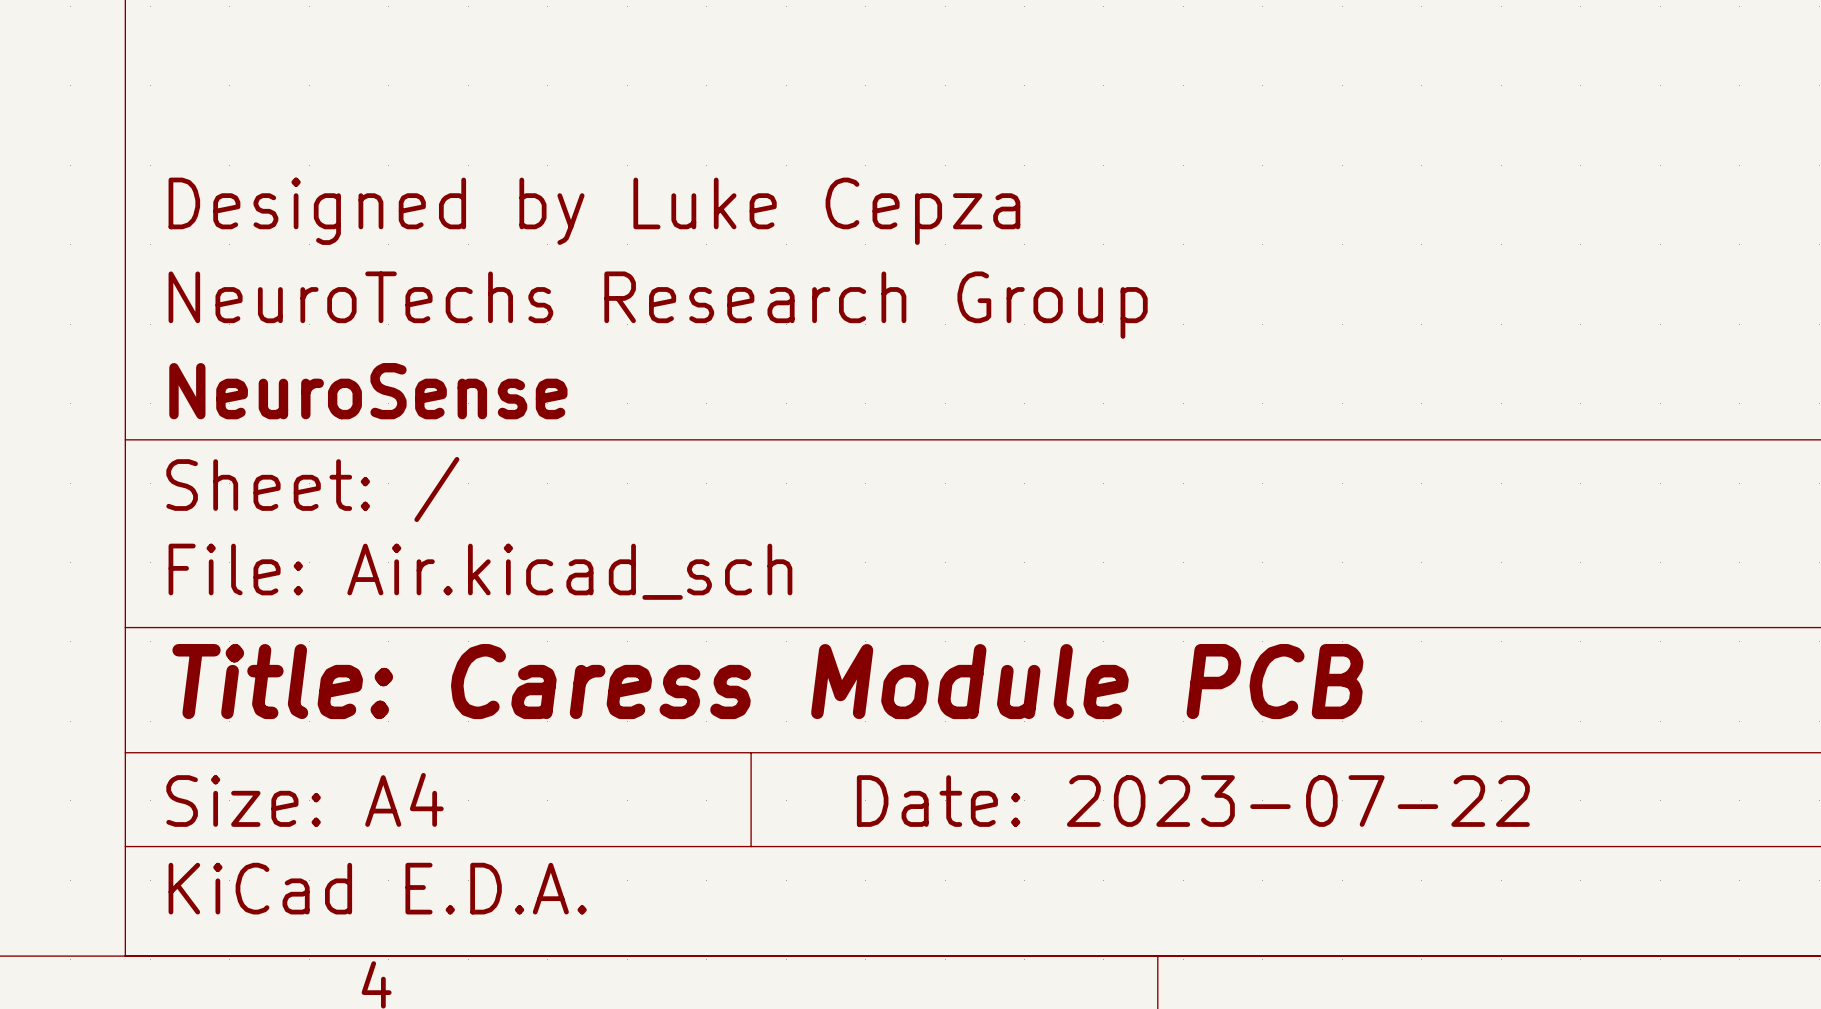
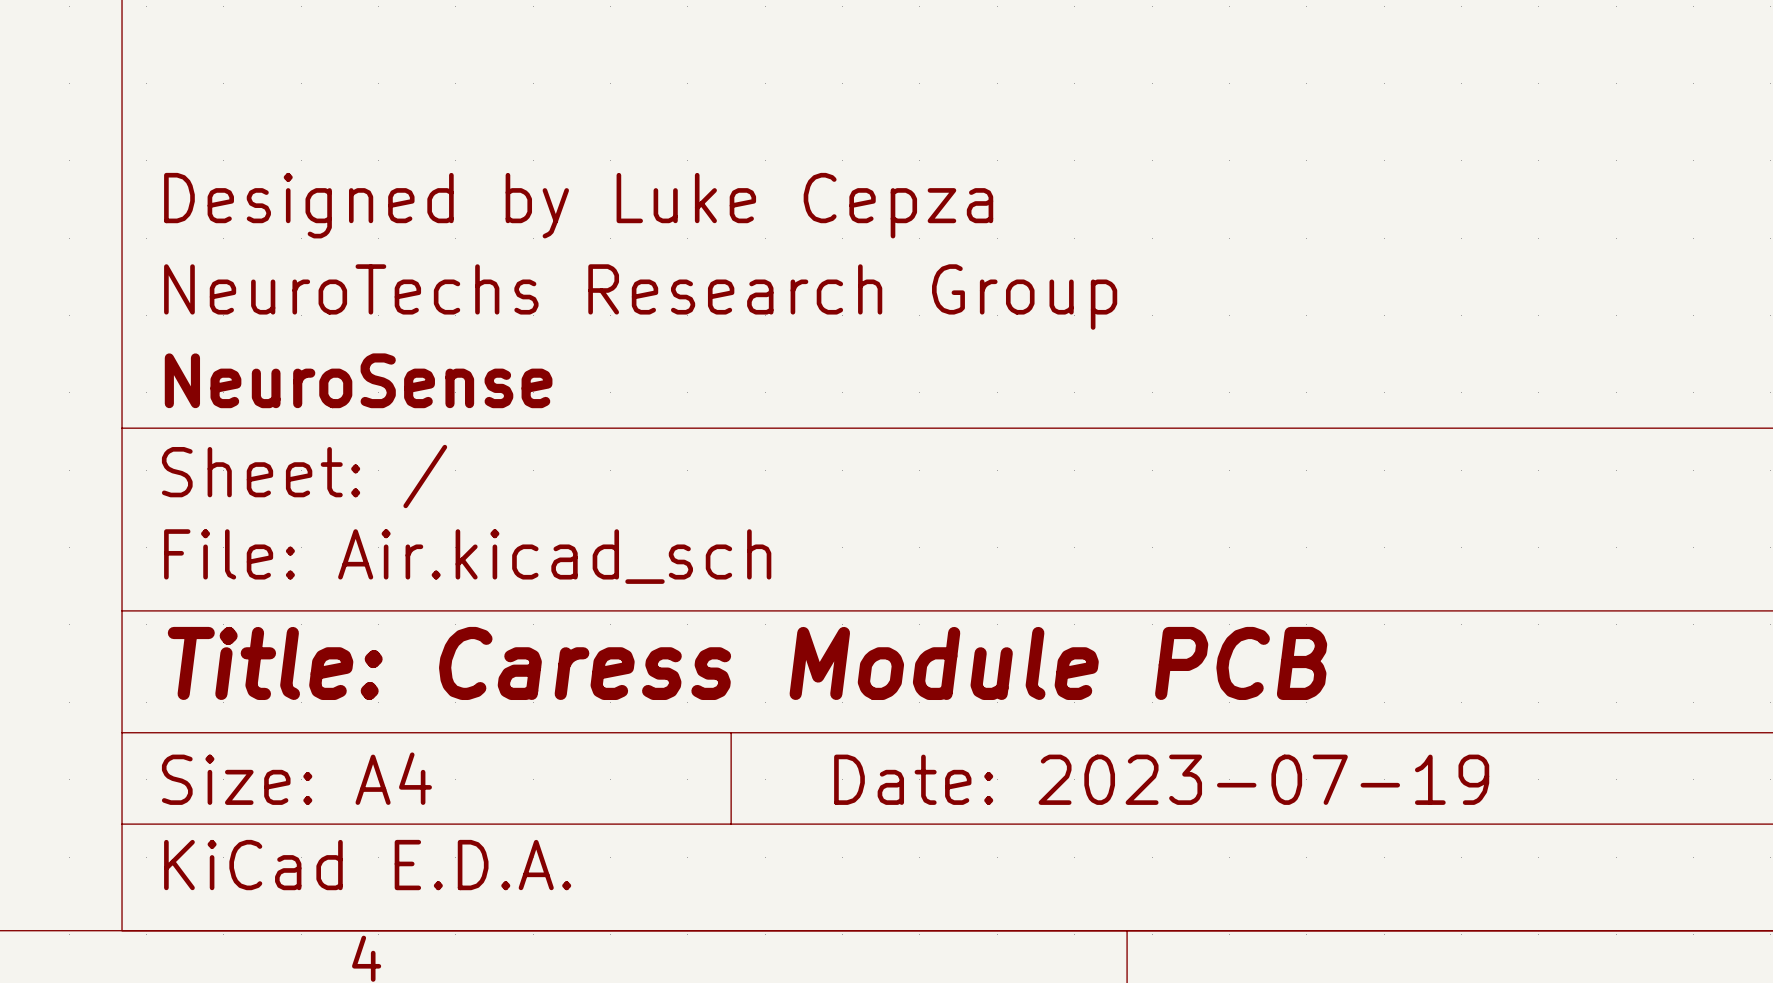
title block: Date: 2023-07-22 (1193, 801) -> Date: 2023-07-19 (1161, 779)

